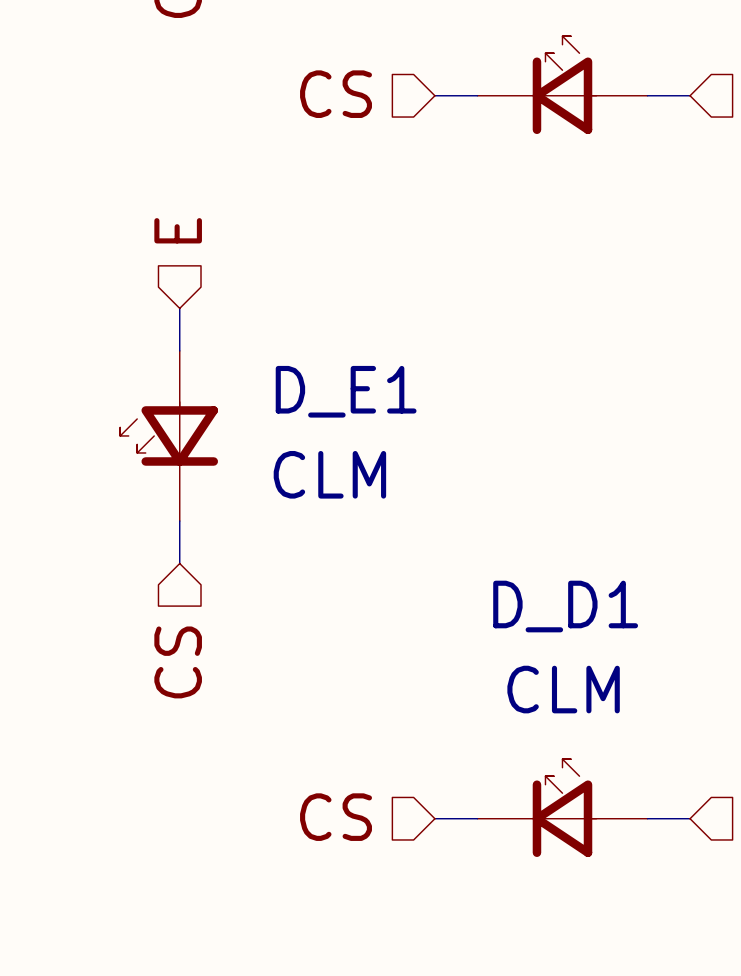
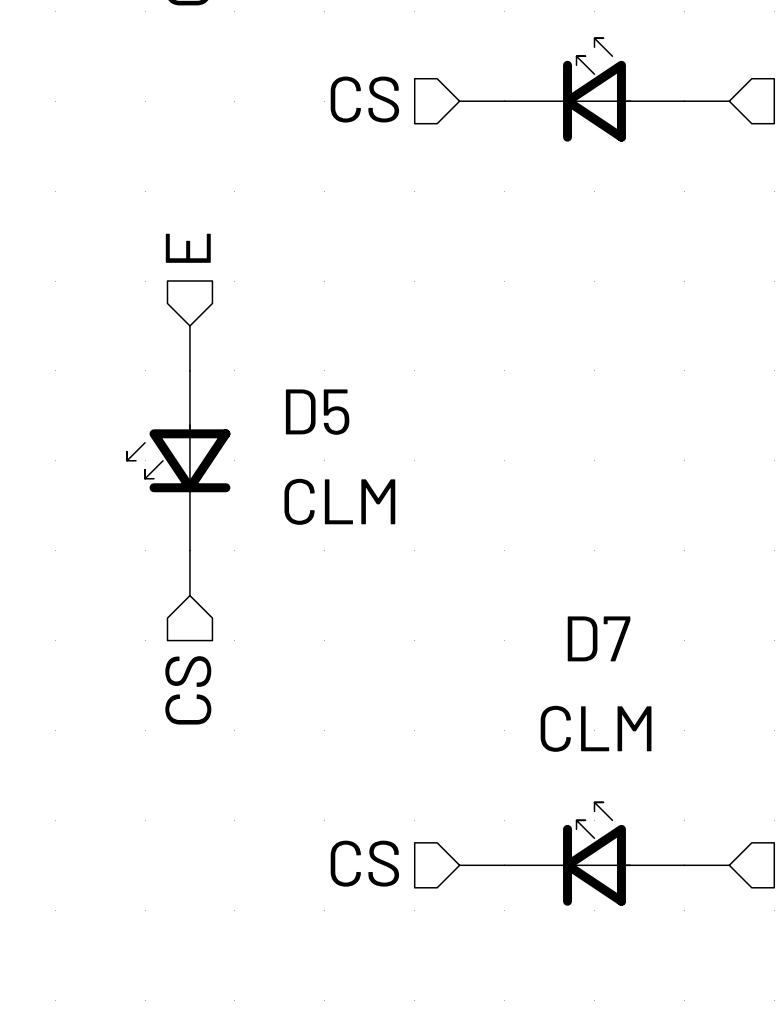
D_E1 name: D_E1 (346, 391) -> D5 (317, 412)
D_D1 name: D_D1 (565, 606) -> D7 (599, 638)

